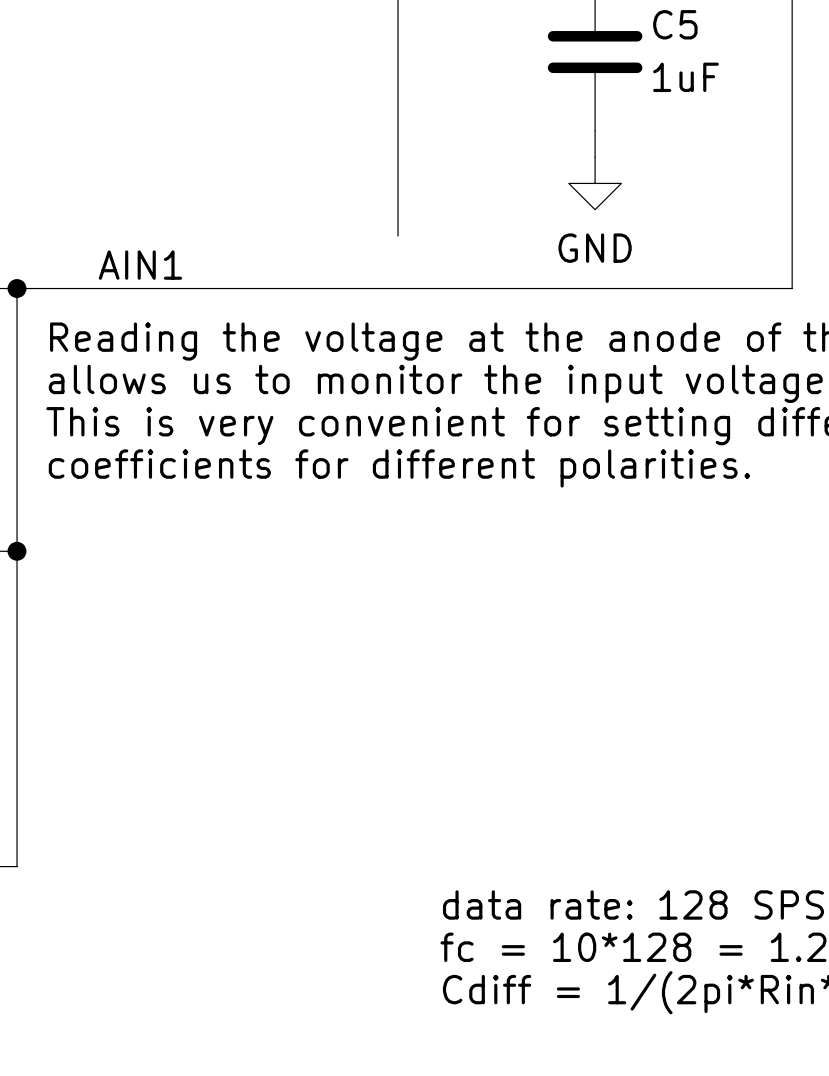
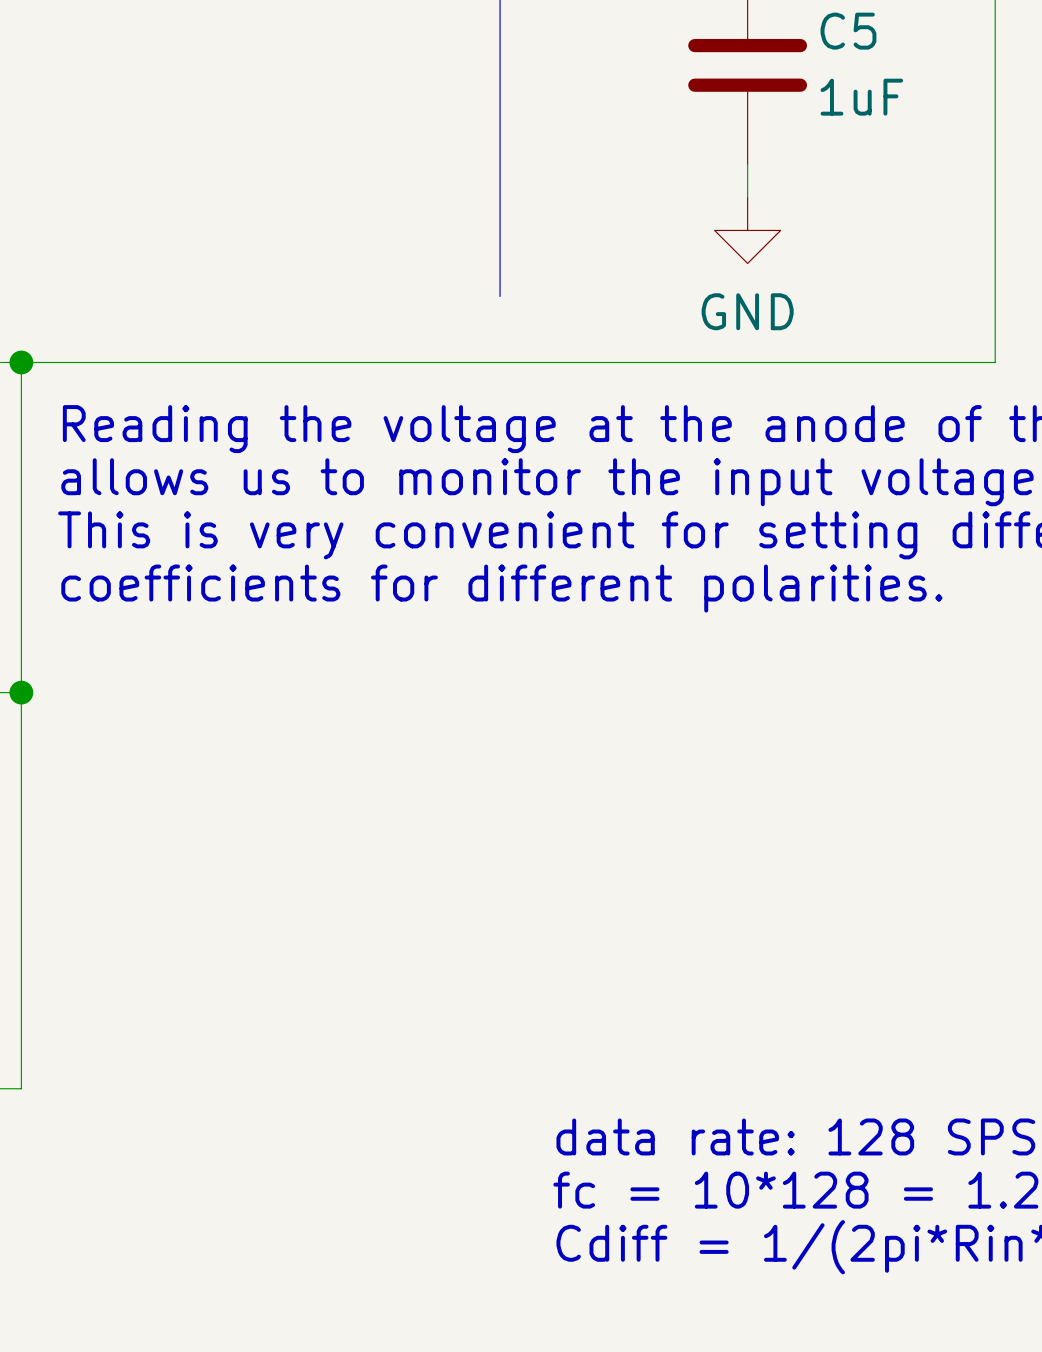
label: AIN1 (140, 265) -> none

